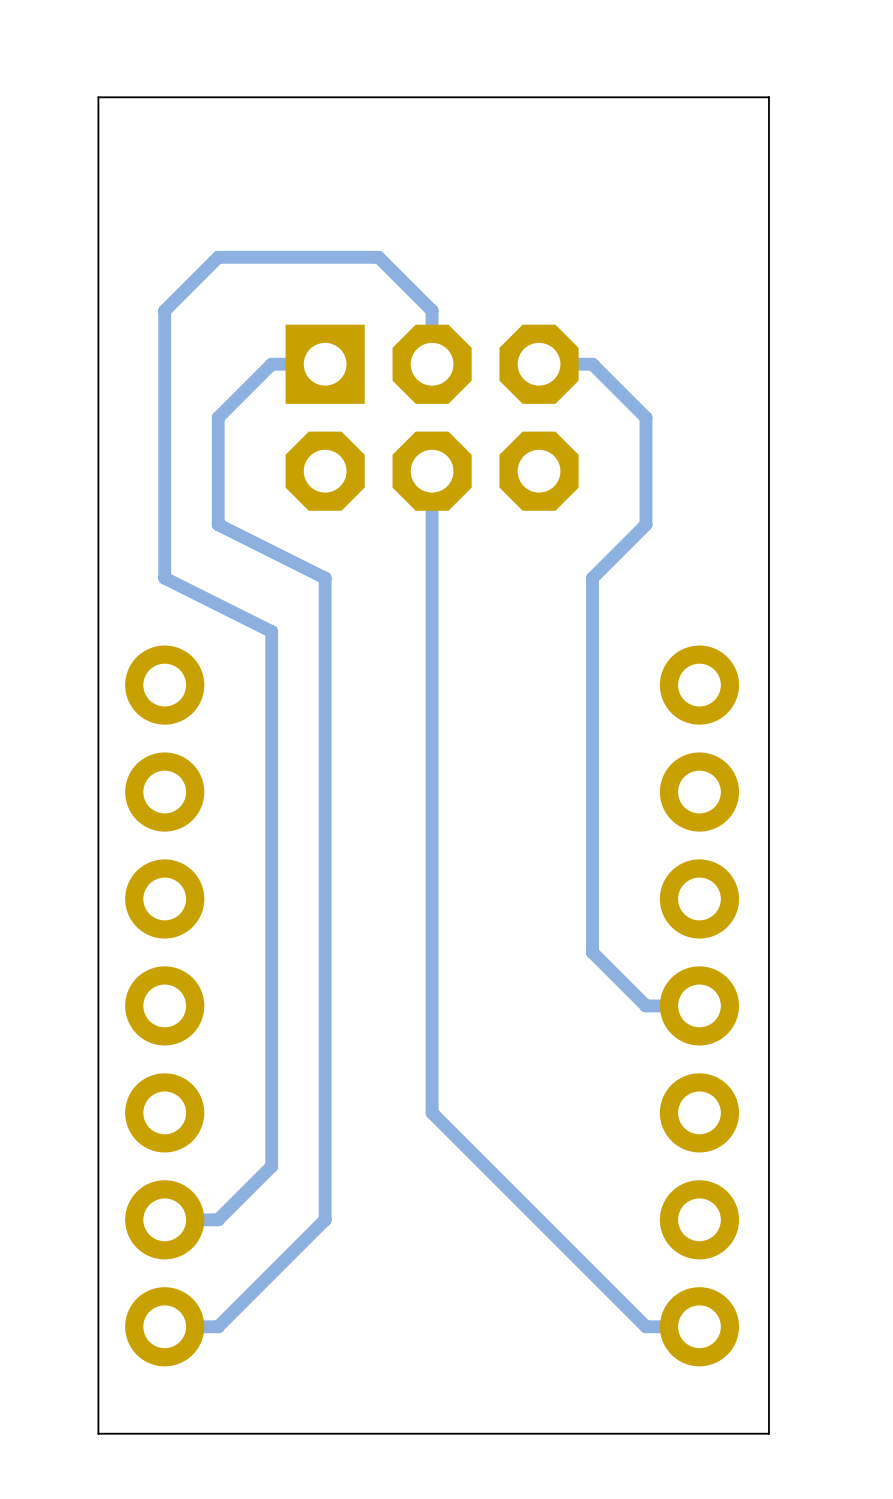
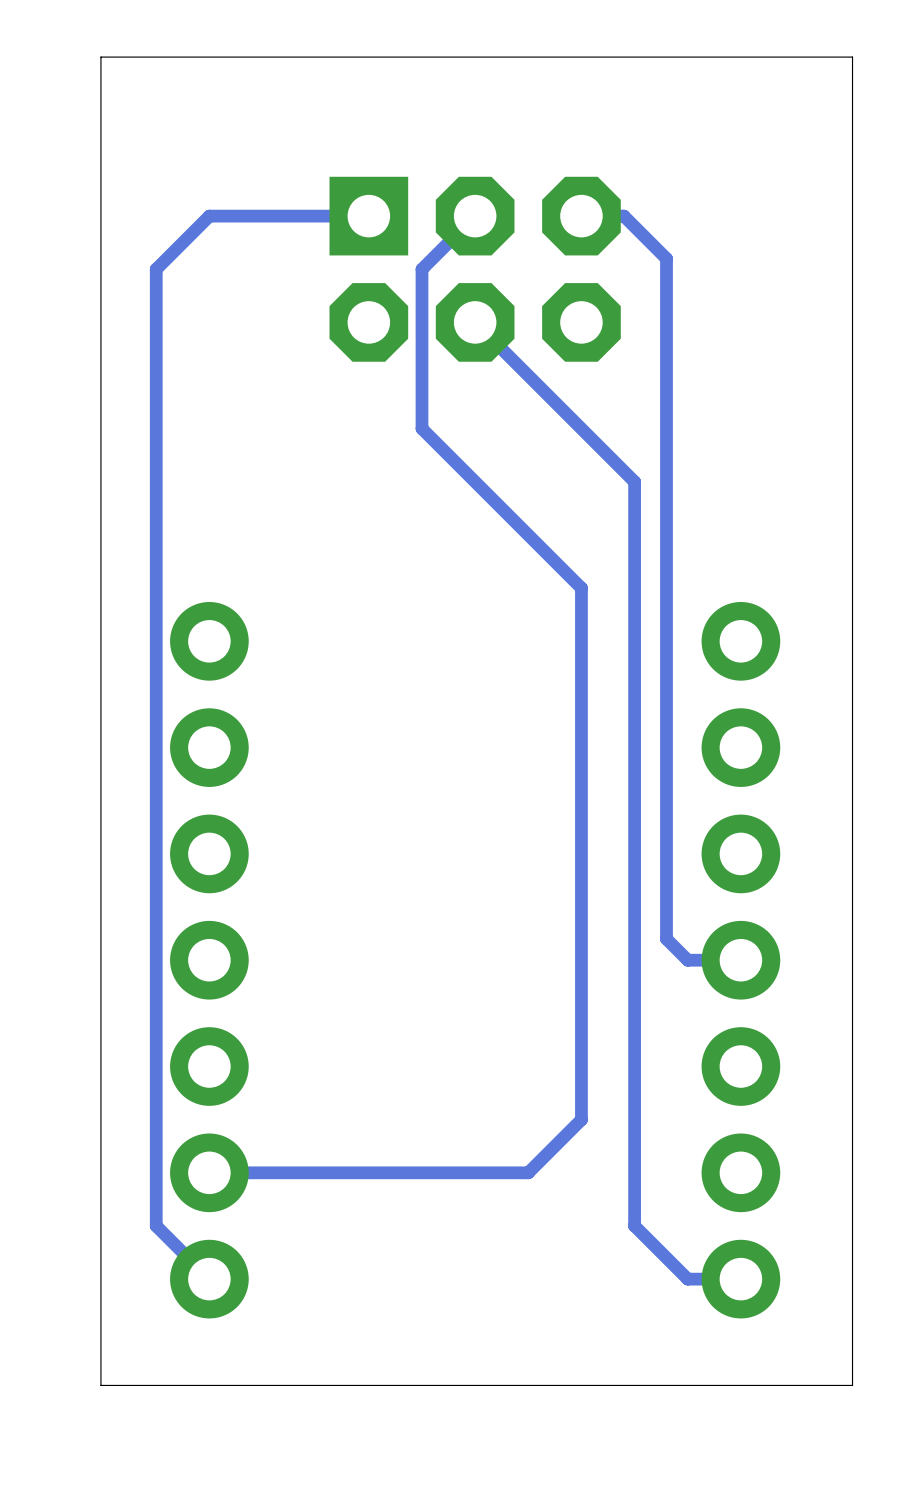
board edge: (98, 97) (98, 1433) -> (143, 57) (100, 57) (100, 1385) (143, 1385)
board edge: (768, 97) (768, 1433) -> (810, 57) (852, 57) (852, 1385) (810, 1385)
track: (218, 257) (164, 310) (164, 578) (271, 631) (271, 1166) (218, 1219) -> (262, 216) (209, 216) (156, 269) (156, 1225) (209, 1279)
track: (325, 257) (378, 257) (432, 310) (432, 364) -> none
track: none -> (475, 216) (422, 269) (422, 428) (581, 588) (581, 1119) (528, 1172) (262, 1172)
track: none -> (581, 216) (623, 216) (666, 258) (666, 938)
track: (325, 364) (271, 364) (218, 417) (218, 524) (325, 578) (325, 1219) (218, 1326) (164, 1326) -> none
track: (539, 364) (592, 364) (645, 417) (645, 524) (592, 578) -> (475, 322) (634, 481) (634, 535)
part position: (432, 417) -> (475, 269)
track: (432, 471) (432, 1112) (592, 1273) -> none
track: (592, 952) (624, 984) -> (634, 907) (634, 1225)

